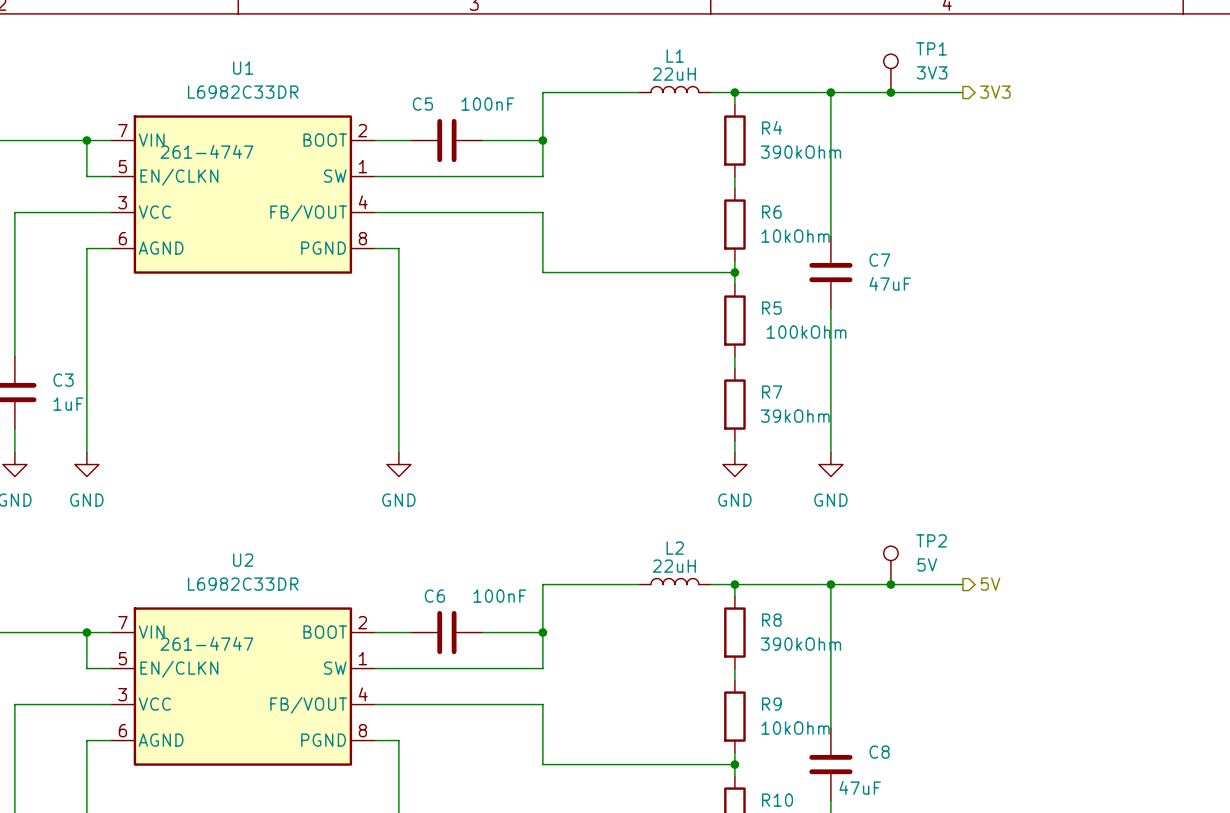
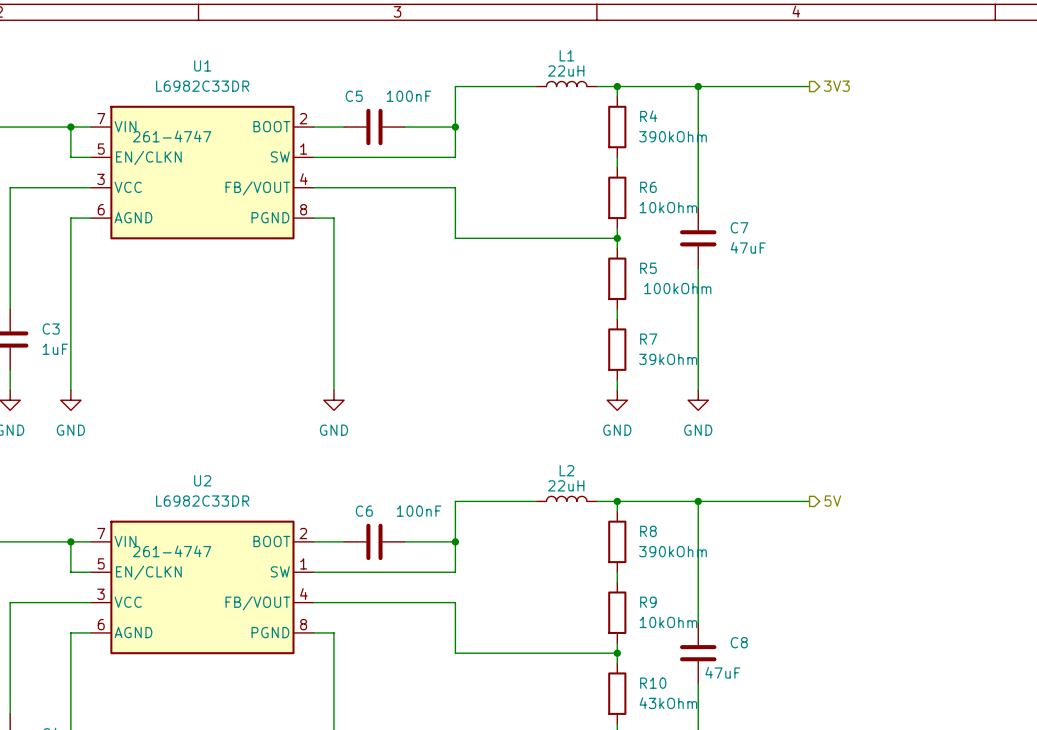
TP1: 3V3 (890, 73) -> none
junction: (890, 92) -> none
TP2: 5V (890, 565) -> none
junction: (890, 584) -> none

